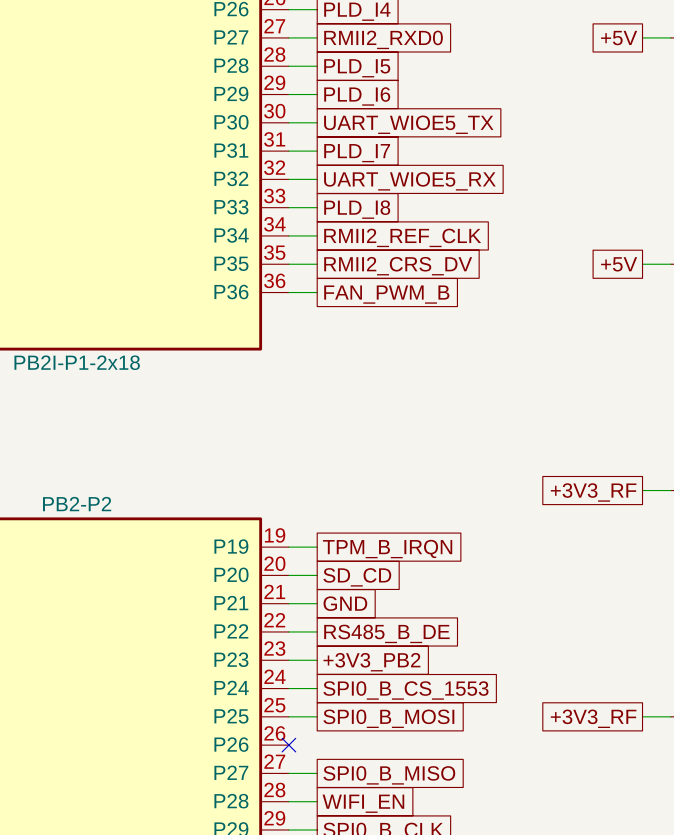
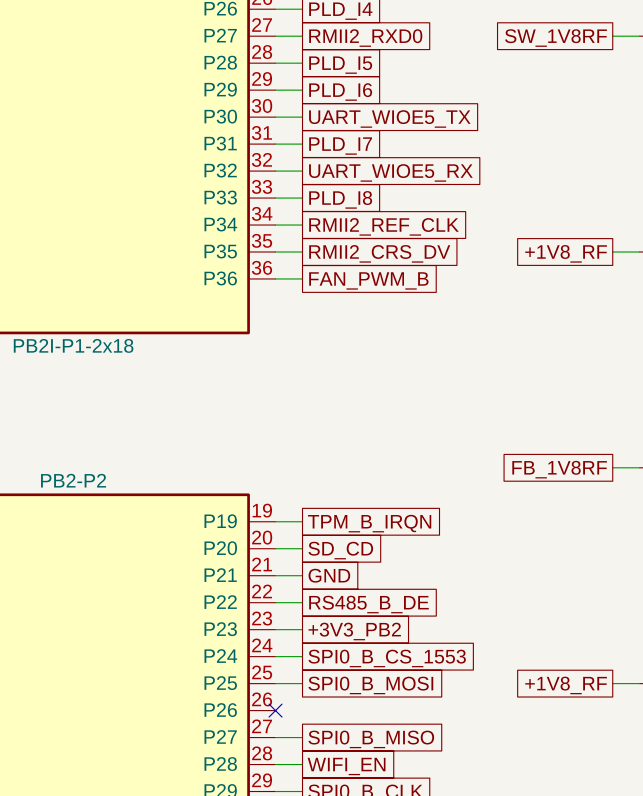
global label: +5V (619, 38) -> SW_1V8RF (555, 38)
global label: +5V (619, 264) -> +1V8_RF (566, 253)
global label: +3V3_RF (593, 492) -> FB_1V8RF (559, 469)
global label: +3V3_RF (593, 718) -> +1V8_RF (566, 685)

